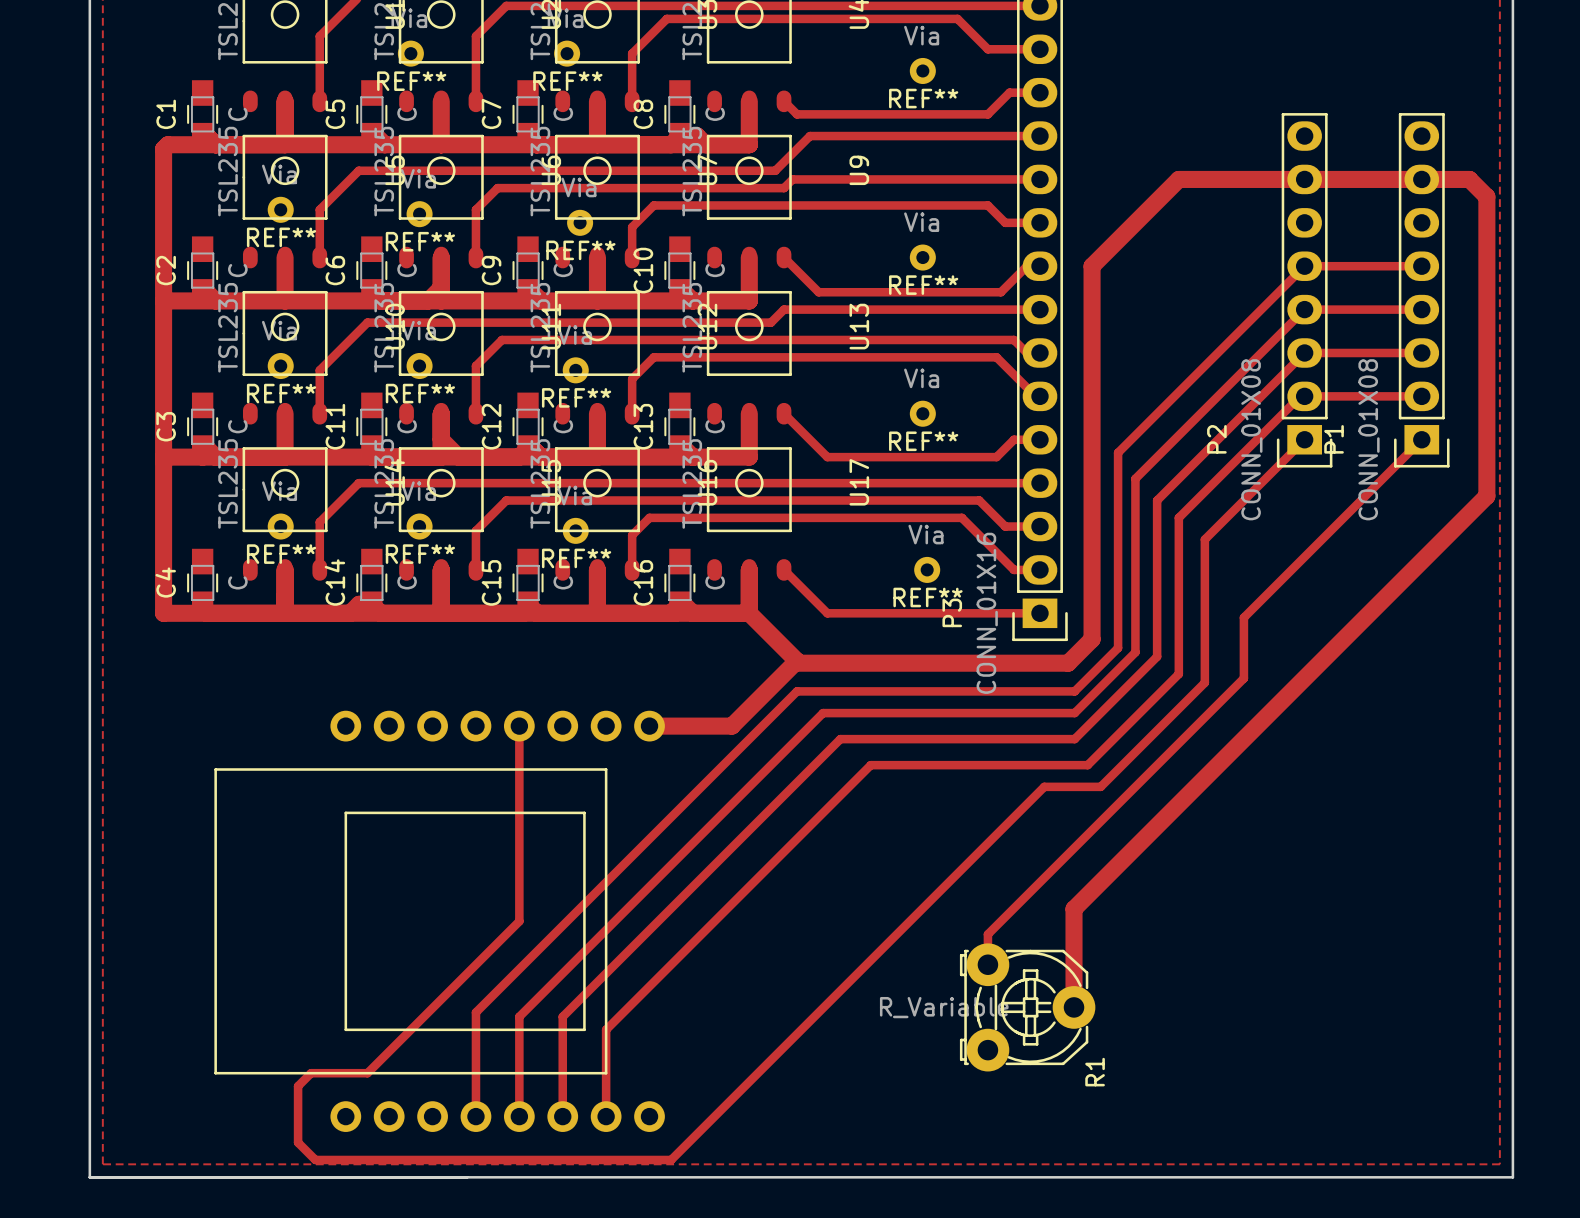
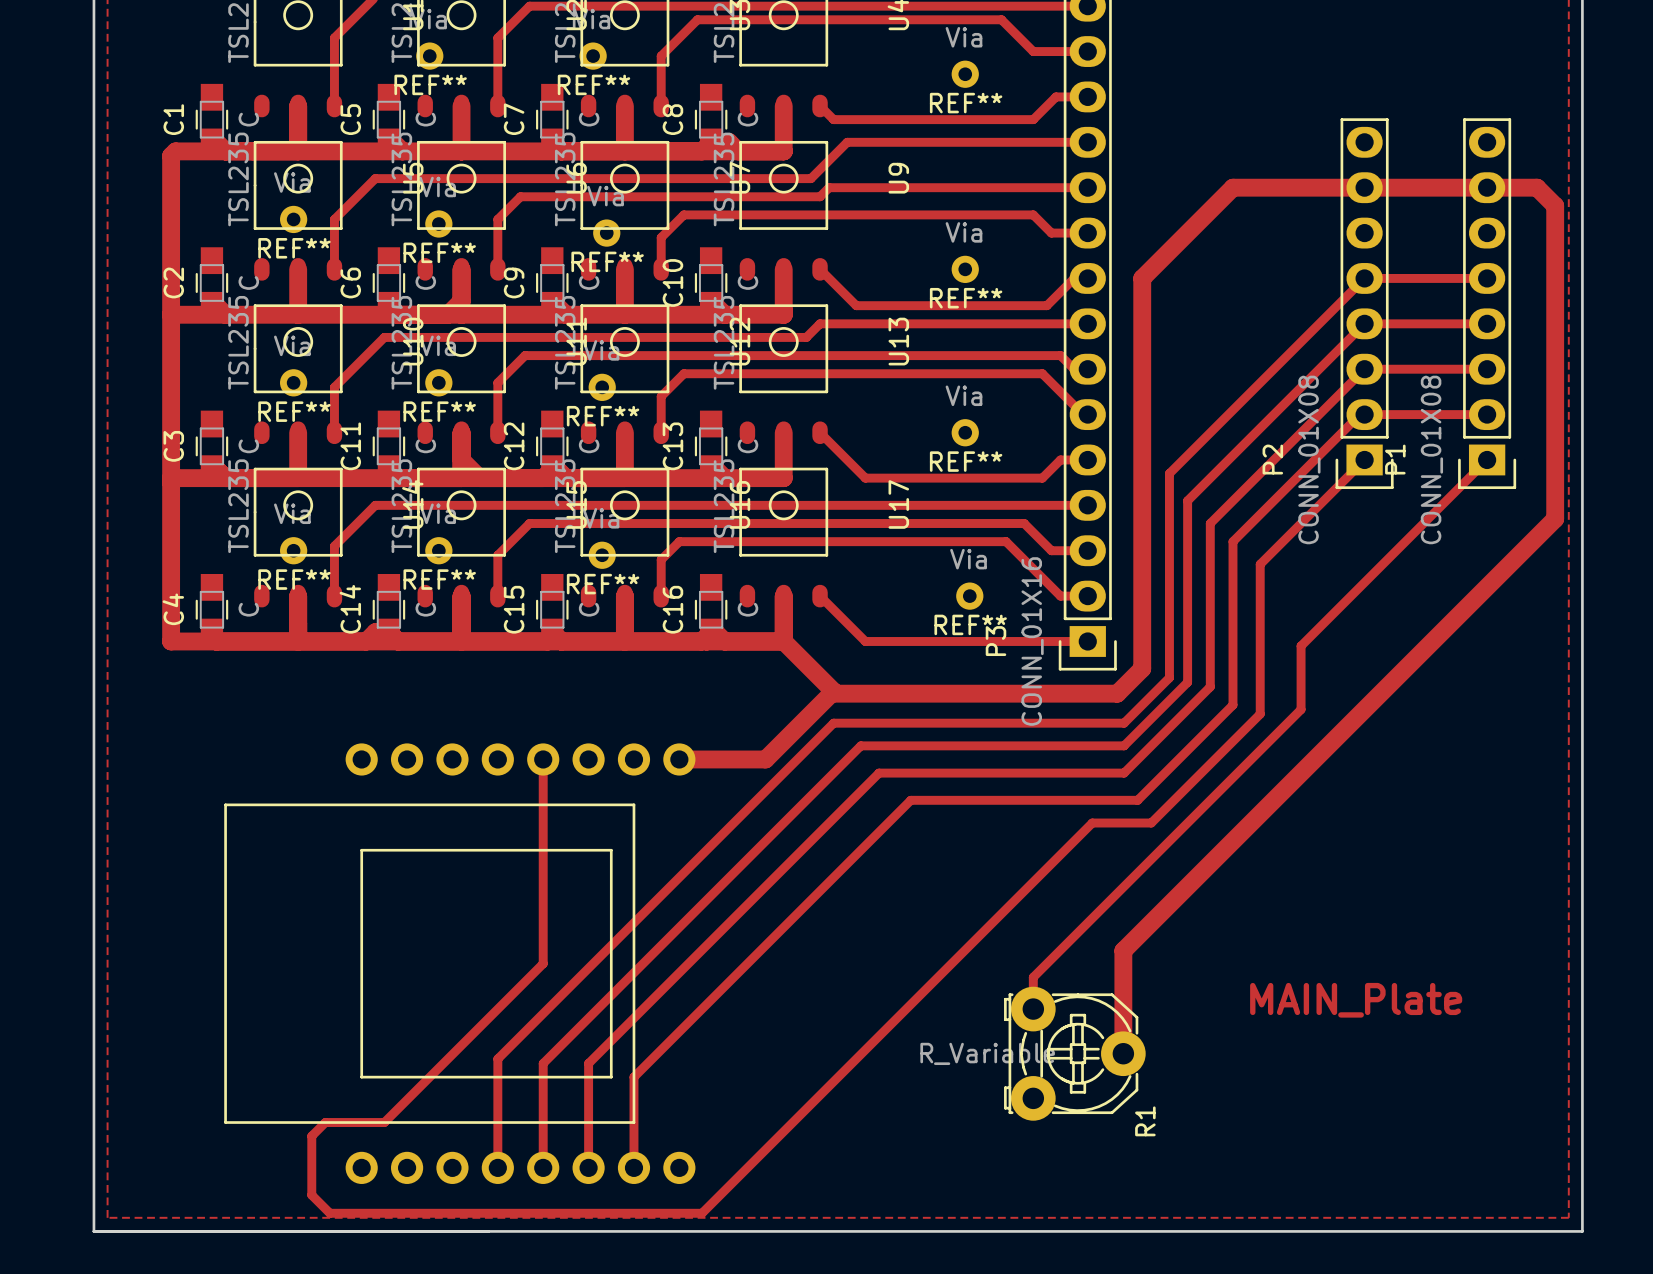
text: none -> MAIN_Plate (1356, 1000)

